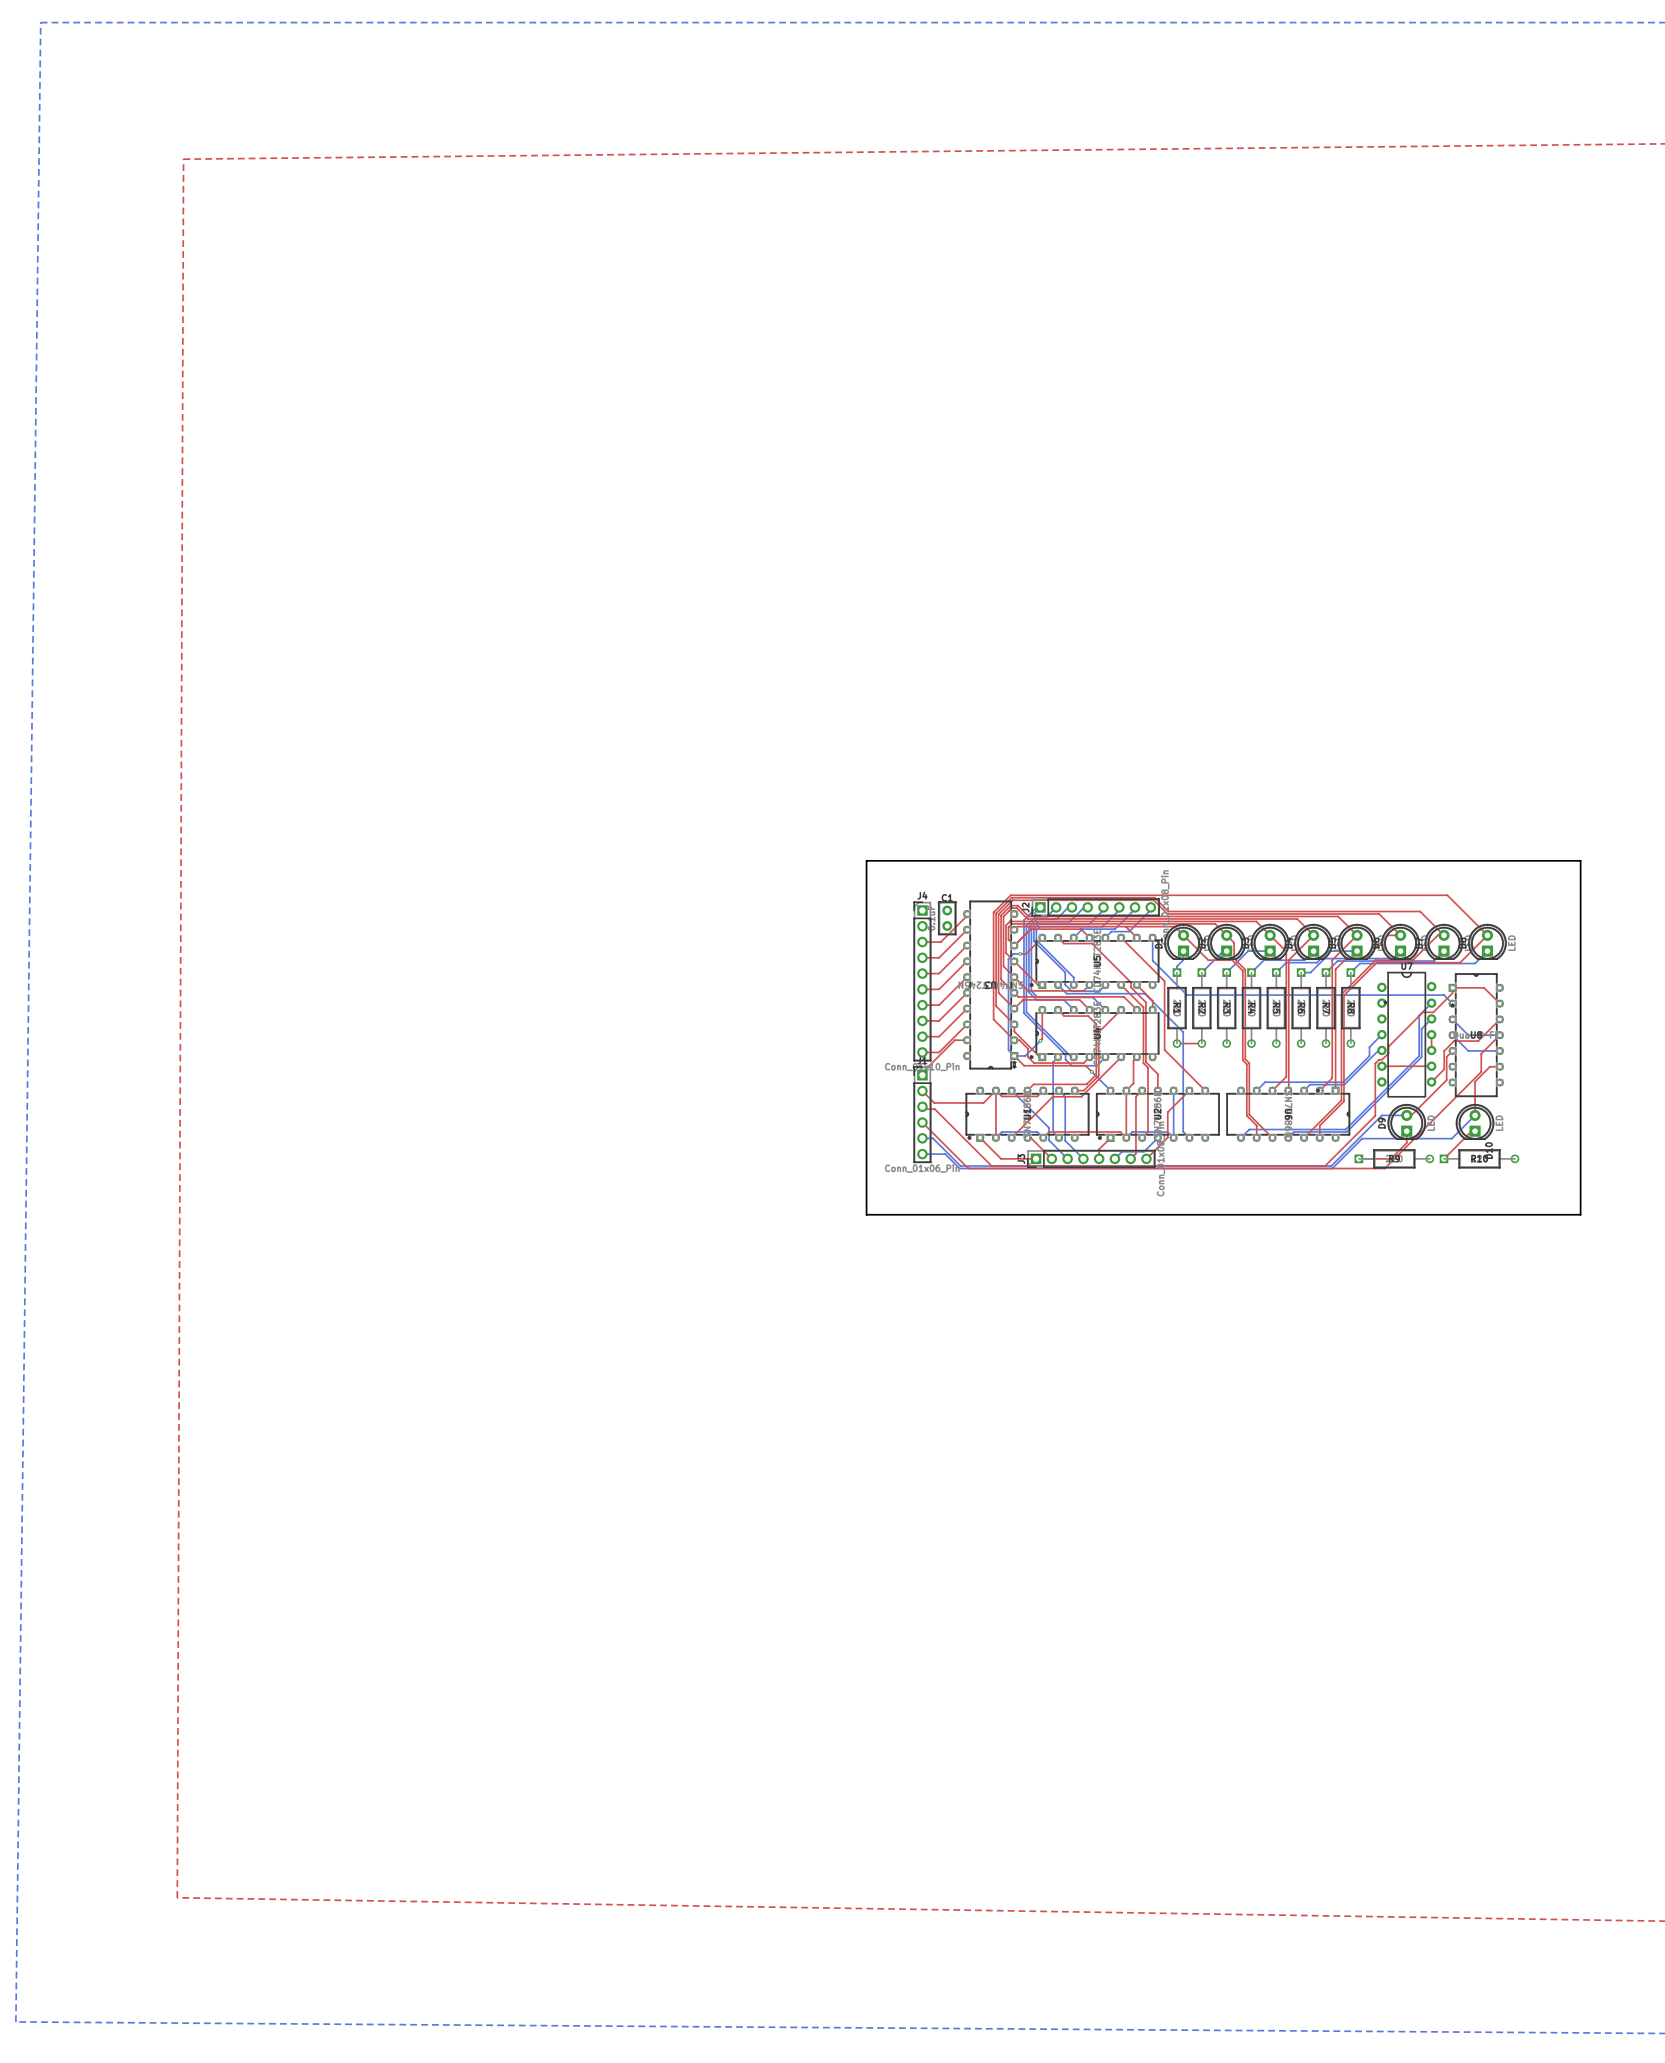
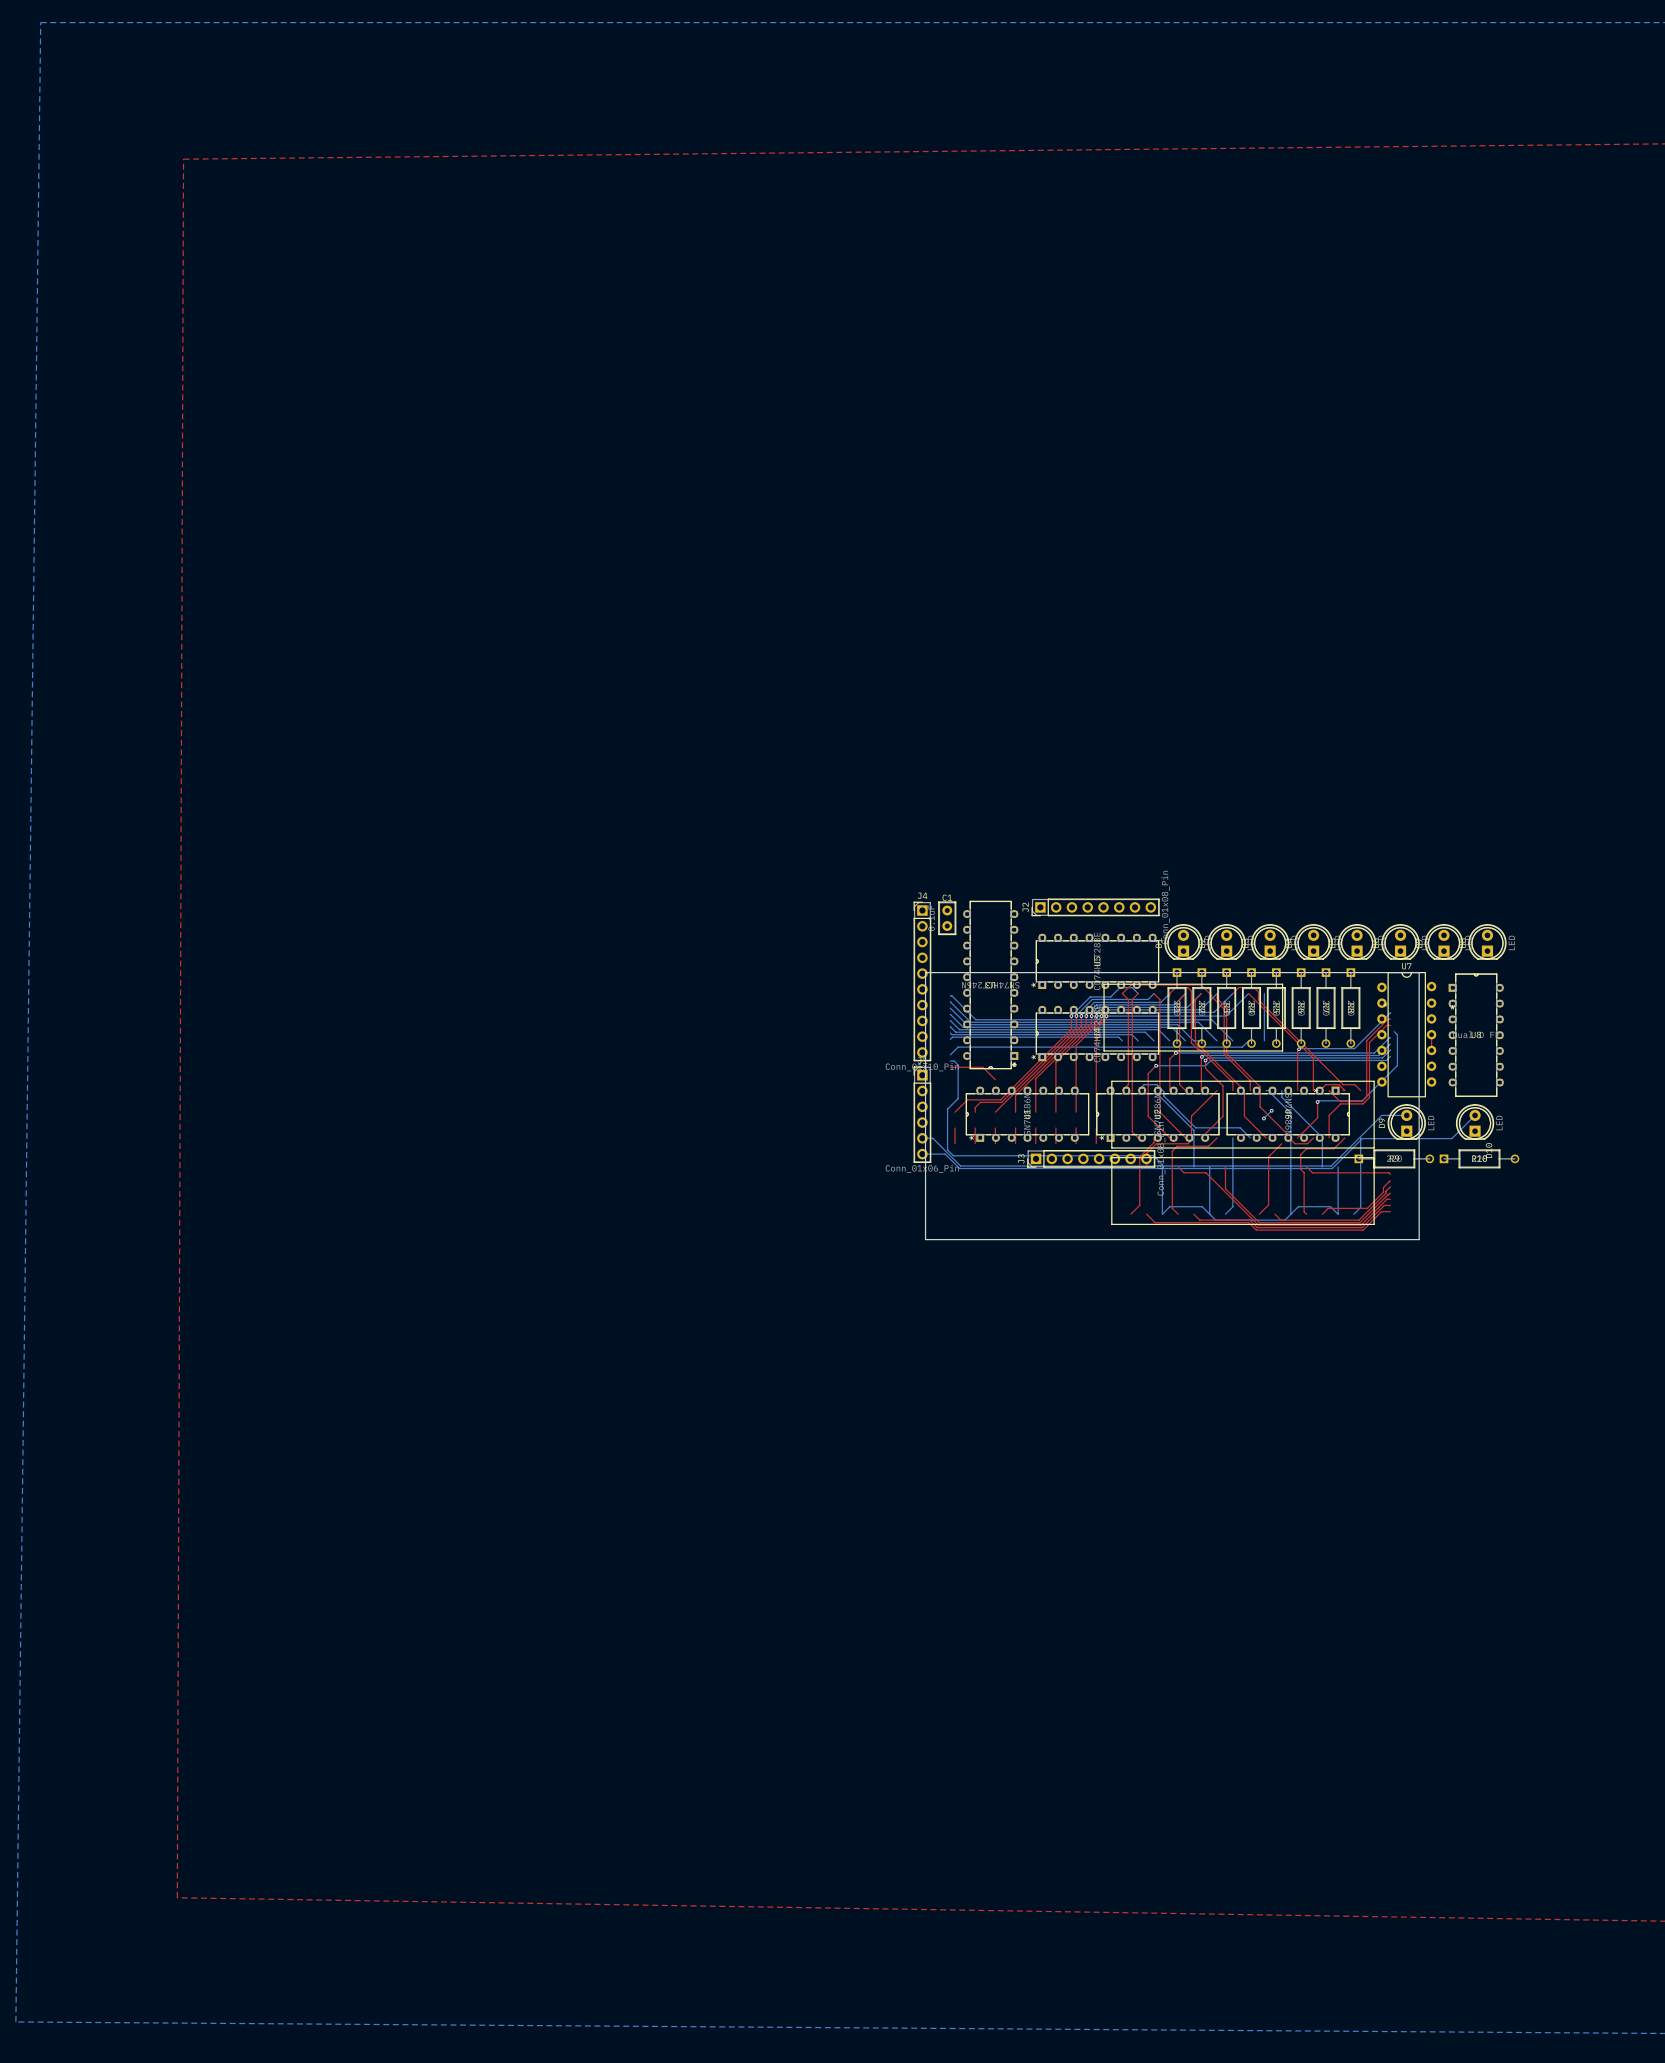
board edge: (866, 860) (1580, 860) (1580, 1214) (866, 1214) (866, 860) -> none
bottom track: (1040, 907) (1036, 907) (1023, 920) (1023, 1013) (1065, 1054) (1065, 1059) (1071, 1065) (1096, 1065) (1105, 1057) -> none
bottom track: (1056, 907) (1046, 916) (1035, 916) (1026, 925) (1026, 1012) (1071, 1057) (1073, 1057) -> none
bottom track: (1071, 907) (1068, 907) (1056, 919) (1036, 919) (1028, 926) (1028, 992) (1036, 999) (1063, 999) (1073, 1009) -> none
bottom track: (1087, 907) (1084, 907) (1069, 921) (1037, 921) (1031, 927) (1031, 991) (1037, 997) (1092, 997) (1105, 1009) -> none
bottom track: (1103, 907) (1103, 910) (1089, 924) (1038, 924) (1033, 929) (1033, 941) (1065, 972) (1065, 984) (1071, 991) (1099, 991) (1105, 985) -> none
bottom track: (1119, 907) (1119, 910) (1102, 926) (1039, 926) (1036, 930) (1036, 940) (1073, 977) (1073, 985) -> none
bottom track: (1135, 907) (1114, 929) (1082, 929) (1073, 937) -> none
bottom track: (1150, 907) (1150, 910) (1129, 931) (1111, 931) (1105, 937) -> none
top track: (967, 914) (940, 942) (922, 942) -> none
top track: (1125, 926) (1136, 937) -> none
top track: (967, 929) (939, 957) (922, 957) -> none
top track: (1014, 929) (1017, 926) (1174, 926) (1208, 960) (1232, 960) (1242, 970) (1242, 1060) (1246, 1064) (1246, 1115) (1256, 1125) (1256, 1137) -> none
top track: (1042, 937) (1026, 953) (1020, 953) -> none
top track: (1058, 937) (1063, 943) (1092, 943) (1131, 982) (1131, 987) (1145, 1002) (1145, 1062) (1157, 1074) (1157, 1090) -> none
top track: (1089, 937) (1081, 929) (1030, 929) (1014, 945) (1008, 939) (1008, 927) (1011, 923) (1215, 923) (1234, 942) (1234, 958) (1245, 969) (1245, 1059) (1249, 1063) (1249, 1114) (1272, 1137) -> none
top track: (1121, 937) (1164, 981) (1164, 1049) (1205, 1090) -> none
bottom track: (1152, 937) (1152, 960) (1187, 995) (1444, 995) (1452, 1003) -> none
top track: (967, 945) (939, 973) (922, 973) -> none
bottom track: (1183, 951) (1183, 959) (1177, 966) (1177, 972) -> none
bottom track: (1226, 951) (1223, 951) (1201, 972) -> none
bottom track: (1270, 951) (1248, 951) (1226, 972) -> none
bottom track: (1313, 951) (1304, 960) (1263, 960) (1251, 972) -> none
bottom track: (1357, 951) (1328, 951) (1316, 962) (1286, 962) (1276, 972) -> none
bottom track: (1400, 951) (1393, 958) (1324, 958) (1310, 972) (1301, 972) -> none
bottom track: (1444, 951) (1434, 961) (1337, 961) (1326, 972) -> none
bottom track: (1487, 951) (1475, 963) (1359, 963) (1350, 972) -> none
bottom track: (1020, 953) (1013, 953) (1008, 958) (1008, 1050) (1014, 1055) (1025, 1055) (1040, 1040) -> none
via: (1020, 953) -> none
top track: (967, 961) (939, 989) (922, 989) -> none
board edge: none -> (925, 972) (1419, 972) (1419, 1239) (925, 1239) (925, 972)
top track: (967, 977) (939, 1005) (922, 1005) -> none
line: none -> (1104, 984) (1282, 984) (1282, 1050) (1104, 1050) (1104, 984)
top track: (1042, 985) (1038, 985) (1006, 952) (1006, 925) (1009, 921) (1256, 921) (1286, 951) (1286, 1076) (1272, 1090) -> none
bottom track: (1058, 985) (1066, 993) (1144, 993) (1183, 1032) (1183, 1131) (1189, 1137) -> none
top track: (1089, 985) (1083, 990) (1028, 990) (1003, 966) (1003, 916) (1011, 908) (1016, 908) (1027, 918) (1297, 918) (1313, 935) (1288, 960) (1288, 1090) -> none
top track: (1121, 985) (1143, 1007) (1143, 1063) (1147, 1067) (1147, 1132) (1142, 1137) -> none
top track: (1136, 985) (1152, 1000) (1152, 1009) -> none
top track: (967, 992) (939, 1020) (922, 1020) -> none
top track: none -> (1138, 993) (1132, 999) (1132, 1131) (1138, 1137)
bottom track: none -> (1138, 993) (1132, 987) (1119, 987) (1110, 996) (1090, 996) (1071, 1016)
top track: none -> (1153, 993) (1159, 999) (1159, 1112) (1185, 1137)
bottom track: none -> (1153, 993) (1148, 999) (1092, 999) (1076, 1016)
bottom track: none -> (1169, 993) (1160, 1002) (1094, 1002) (1081, 1016)
top track: none -> (1185, 993) (1179, 999) (1179, 1084) (1185, 1090)
bottom track: none -> (1185, 993) (1174, 1004) (1096, 1004) (1086, 1016)
top track: none -> (1201, 993) (1195, 999) (1195, 1043) (1244, 1090) (1244, 1116) (1266, 1137)
bottom track: none -> (1201, 993) (1187, 1007) (1097, 1007) (1091, 1013) (1091, 1016)
top track: none -> (1217, 993) (1217, 998) (1226, 1008) (1226, 1053) (1260, 1086) (1260, 1106) (1295, 1143) (1307, 1143) (1313, 1137)
bottom track: none -> (1217, 993) (1200, 1009) (1100, 1009) (1096, 1016)
top track: none -> (1232, 993) (1238, 987) (1254, 987) (1258, 991) (1258, 999) (1343, 1084) (1354, 1084) (1360, 1090)
bottom track: none -> (1232, 993) (1214, 1012) (1102, 1012) (1101, 1016)
top track: none -> (1248, 993) (1313, 1058) (1313, 1090)
bottom track: none -> (1248, 993) (1226, 1016) (1106, 1016)
bottom track: none -> (1264, 993) (1264, 1040)
bottom track: none -> (950, 995) (975, 1019) (1211, 1019) (1232, 1040)
top track: none -> (1169, 996) (1169, 993) (1175, 987) (1187, 987) (1191, 991) (1191, 1042) (1232, 1082) (1232, 1090)
bottom track: none -> (950, 1002) (970, 1022) (1198, 1022) (1217, 1040)
bottom track: (1431, 1003) (1419, 1015) (1419, 1056) (1345, 1129) (1249, 1129) (1240, 1137) -> none
top track: (1499, 1003) (1484, 987) (1452, 987) (1452, 993) (1433, 1012) (1422, 1012) (1388, 1046) (1388, 1053) (1375, 1063) (1375, 1115) (1325, 1166) (991, 1166) (934, 1109) (924, 1109) (922, 1106) -> none
bottom track: none -> (950, 1008) (966, 1024) (1177, 1024) (1193, 1040) (1201, 1040)
top track: (967, 1008) (939, 1036) (922, 1036) -> none
top track: (1042, 1009) (1042, 1039) (1040, 1040) -> none
top track: (1058, 1009) (1064, 1016) (1088, 1016) (1096, 1024) (1096, 1028) -> (1106, 1016) (1106, 1018) (1096, 1028)
top track: (1089, 1009) (1079, 999) (1023, 999) (1014, 1008) (998, 992) (998, 914) (1012, 900) (1153, 900) (1167, 913) (1379, 913) (1400, 935) (1388, 935) (1364, 958) (1346, 958) (1335, 969) (1335, 1090) -> none
top track: (1121, 1009) (1098, 1032) (1098, 1075) (1083, 1090) (1074, 1090) -> none
top track: (1136, 1009) (1123, 996) (1018, 996) (1001, 979) (1001, 915) (1010, 905) (1017, 905) (1028, 916) (1338, 916) (1357, 935) (1332, 960) (1332, 1078) (1325, 1084) -> (1343, 1090) (1344, 1090) (1339, 1084) (1325, 1084)
bottom track: none -> (1390, 1012) (1354, 1048) (1299, 1049)
bottom track: none -> (950, 1014) (963, 1027) (1171, 1027) (1185, 1040)
top track: none -> (1071, 1016) (1071, 1029) (1000, 1099) (967, 1099) (955, 1112)
via: none -> (1071, 1016)
top track: none -> (1076, 1016) (1076, 1027) (1001, 1102) (980, 1102) (975, 1107) (975, 1112)
via: none -> (1076, 1016)
top track: none -> (1081, 1016) (1081, 1026) (995, 1112)
via: none -> (1081, 1016)
top track: none -> (1086, 1016) (1086, 1024) (1015, 1095) (1015, 1112)
via: none -> (1086, 1016)
top track: none -> (1091, 1016) (1091, 1022) (1035, 1078) (1035, 1112)
via: none -> (1091, 1016)
top track: none -> (1096, 1016) (1096, 1021) (1055, 1062) (1055, 1112)
via: none -> (1096, 1016)
top track: none -> (1101, 1016) (1101, 1020) (1076, 1045) (1076, 1112)
via: none -> (1101, 1016)
via: none -> (1106, 1016)
bottom track: (1431, 1018) (1421, 1028) (1421, 1057) (1346, 1132) (1294, 1132) (1288, 1137) -> none
top track: none -> (1390, 1019) (1388, 1019) (1366, 1040) (1366, 1096) (1362, 1101) (1340, 1101) (1329, 1090)
bottom track: (1452, 1019) (1468, 1035) (1499, 1035) -> none
top track: (1499, 1019) (1478, 1041) (1454, 1041) (1444, 1051) (1444, 1069) (1431, 1082) -> none
bottom track: none -> (950, 1020) (959, 1029) (1158, 1029) (1169, 1040)
top track: (967, 1024) (939, 1052) (922, 1052) -> none
top track: none -> (1390, 1025) (1386, 1025) (1369, 1042) (1369, 1097) (1363, 1103) (1340, 1103) (1329, 1115) (1329, 1137)
bottom track: none -> (950, 1026) (955, 1032) (1145, 1032) (1153, 1040)
bottom track: none -> (1394, 1031) (1397, 1034) (1397, 1065) (1362, 1100) (1317, 1102)
bottom track: none -> (950, 1033) (951, 1034) (1131, 1034) (1138, 1040)
bottom track: (1381, 1034) (1369, 1047) (1369, 1056) (1343, 1082) (1265, 1082) (1256, 1090) -> none
bottom track: (1452, 1035) (1468, 1050) (1499, 1050) -> none
top track: (1499, 1035) (1481, 1053) (1481, 1071) (1384, 1168) (968, 1168) (922, 1122) -> none
bottom track: none -> (1390, 1037) (1374, 1053) (1175, 1053)
bottom track: none -> (950, 1039) (952, 1037) (1118, 1037) (1122, 1040)
top track: (967, 1040) (954, 1040) (922, 1072) (922, 1075) -> none
via: (1040, 1040) -> none
bottom track: none -> (1248, 1040) (1242, 1047) (958, 1047) (950, 1054)
top track: (1177, 1043) (1201, 1043) -> none
bottom track: none -> (1390, 1044) (1378, 1055) (1201, 1056)
top track: none -> (1299, 1049) (1297, 1090)
via: none -> (1299, 1049)
bottom track: (1381, 1050) (1378, 1050) (1344, 1084) (1309, 1084) (1304, 1090) -> none
bottom track: none -> (1390, 1050) (1382, 1057) (1208, 1057) (1205, 1060)
top track: (1452, 1050) (1446, 1056) (1446, 1080) (1411, 1115) (1406, 1115) -> none
top track: none -> (1175, 1053) (1169, 1059) (1169, 1090)
via: none -> (1175, 1053)
top track: (1014, 1055) (1024, 1065) (1085, 1065) (1091, 1071) -> none
top track: none -> (1201, 1056) (1201, 1090)
via: none -> (1201, 1056)
bottom track: none -> (1390, 1056) (1386, 1060) (1210, 1060) (1205, 1065) (1156, 1065)
top track: (1039, 1057) (1014, 1031) (1014, 1024) (996, 1006) (996, 913) (1011, 897) (1154, 897) (1168, 911) (1420, 911) (1444, 935) (1437, 935) (1412, 960) (1375, 960) (1341, 994) (1341, 1100) (1304, 1137) -> none
bottom track: (1058, 1057) (1053, 1062) (1053, 1132) (1059, 1137) -> none
top track: (1089, 1057) (1083, 1063) (1034, 1063) (1027, 1057) (1027, 1048) (1019, 1040) (1014, 1040) (993, 1019) (993, 912) (1010, 895) (1447, 895) (1487, 935) (1460, 962) (1376, 962) (1343, 995) (1343, 1101) (1319, 1125) (1319, 1137) -> none
top track: (1121, 1057) (1081, 1096) (1052, 1096) (1011, 1137) -> none
top track: (1136, 1057) (1133, 1060) (1133, 1083) (1126, 1090) (1126, 1137) (1120, 1132) (1049, 1132) (1043, 1137) -> none
top track: none -> (1205, 1060) (1205, 1068) (1223, 1085) (1223, 1116) (1201, 1137)
via: none -> (1205, 1060)
bottom track: none -> (950, 1061) (954, 1061) (958, 1065) (958, 1098) (947, 1109) (947, 1149) (953, 1155) (1153, 1155) (1162, 1164)
top track: none -> (1156, 1065) (1148, 1073) (1148, 1116) (1169, 1137)
via: none -> (1156, 1065)
top track: (1381, 1066) (1431, 1066) -> none
top track: (1499, 1066) (1489, 1066) (1475, 1081) (1475, 1115) -> none
top track: none -> (950, 1067) (982, 1067) (995, 1079)
bottom track: (1091, 1071) (1110, 1090) -> none
via: (1091, 1071) -> none
top track: (1096, 1074) (1086, 1084) (1033, 1084) (1027, 1090) -> (1096, 1074) (1096, 1112)
line: none -> (1111, 1081) (1111, 1148) (1374, 1148) (1374, 1081) (1111, 1081)
top track: (995, 1090) (1001, 1096) (1037, 1096) (1043, 1090) -> none
top track: (995, 1090) (983, 1102) (934, 1102) (922, 1091) -> none
top track: (995, 1090) (995, 1137) -> none
bottom track: (1011, 1090) (1049, 1128) (1049, 1140) (1067, 1158) -> none
bottom track: (1059, 1090) (1065, 1096) (1065, 1140) (1083, 1158) -> none
top track: none -> (1122, 1090) (1128, 1084) (1128, 999) (1122, 993) (1130, 985) (1201, 985) (1224, 1009) (1224, 1054) (1250, 1080) (1250, 1090)
bottom track: none -> (1138, 1090) (1144, 1084) (1156, 1084) (1163, 1091) (1163, 1096) (1195, 1127) (1240, 1127) (1250, 1137)
top track: (1142, 1090) (1135, 1096) (1135, 1153) (1130, 1158) -> none
bottom track: none -> (1154, 1090) (1193, 1130) (1193, 1166)
bottom track: (1173, 1090) (1173, 1137) (1167, 1132) (1132, 1132) (1126, 1137) -> none
top track: (1189, 1090) (1167, 1112) (1167, 1137) (1146, 1158) -> none
top track: none -> (1217, 1090) (1191, 1116) (1191, 1140) (1188, 1143) (1156, 1143) (1146, 1153) (1146, 1166)
bottom track: none -> (1266, 1090) (1269, 1090) (1290, 1113) (1290, 1214)
bottom track: none -> (1281, 1090) (1281, 1097) (1322, 1137) (1322, 1166)
top track: none -> (1317, 1102) (1317, 1117) (1297, 1137)
via: none -> (1317, 1102)
bottom track: none -> (1271, 1110) (1263, 1118)
via: none -> (1271, 1110)
via: none -> (1263, 1118)
top track: none -> (955, 1127) (955, 1143)
top track: none -> (975, 1127) (975, 1143)
top track: none -> (995, 1127) (995, 1143)
top track: none -> (1015, 1127) (1015, 1143)
top track: none -> (1035, 1127) (1035, 1143)
top track: none -> (1055, 1127) (1055, 1143)
top track: none -> (1076, 1127) (1076, 1143)
top track: none -> (1096, 1127) (1096, 1143)
top track: (1406, 1131) (1406, 1142) (1390, 1158) (1358, 1158) -> none
top track: (1475, 1131) (1471, 1131) (1444, 1158) -> none
top track: (980, 1137) (1001, 1158) (1036, 1158) -> none
bottom track: (995, 1137) (1001, 1132) (1037, 1132) (1043, 1137) -> none
top track: (1027, 1137) (1030, 1137) (1051, 1158) -> none
top track: (1110, 1137) (1099, 1149) (1099, 1158) -> none
top track: none -> (1154, 1137) (1154, 1142) (1139, 1156) (1139, 1205) (1130, 1214)
bottom track: (1157, 1137) (1144, 1151) (1122, 1151) (1114, 1158) -> none
top track: none -> (1217, 1137) (1208, 1146) (1177, 1146) (1172, 1151) (1172, 1208) (1178, 1214)
bottom track: none -> (1232, 1137) (1232, 1206) (1225, 1214)
top track: none -> (1344, 1137) (1334, 1148) (1306, 1148) (1300, 1154) (1300, 1169) (1304, 1172) (1304, 1211) (1306, 1214)
bottom track: none -> (1360, 1137) (1360, 1207) (1353, 1214)
top track: none -> (1281, 1143) (1268, 1156) (1268, 1204) (1259, 1214)
line: none -> (1111, 1157) (1374, 1157) (1374, 1224) (1111, 1224) (1111, 1157)
bottom track: none -> (1162, 1166) (1162, 1214) (1169, 1206) (1202, 1206) (1215, 1220) (1227, 1220)
top track: none -> (1178, 1166) (1184, 1172) (1205, 1172) (1258, 1225) (1361, 1225) (1386, 1199) (1390, 1199)
bottom track: none -> (1209, 1166) (1209, 1214)
top track: none -> (1225, 1166) (1225, 1188) (1259, 1222) (1360, 1222) (1390, 1193)
top track: none -> (1306, 1166) (1312, 1172) (1388, 1172) (1390, 1174)
bottom track: none -> (1338, 1166) (1338, 1214) (1330, 1206) (1298, 1206) (1284, 1220) (1228, 1220)
top track: none -> (1390, 1180) (1383, 1187) (1383, 1192) (1367, 1208) (1328, 1208) (1322, 1214)
top track: none -> (1390, 1186) (1359, 1220) (1280, 1220) (1275, 1214)
top track: none -> (1390, 1205) (1384, 1205) (1362, 1227) (1257, 1227) (1249, 1220) (1199, 1220) (1193, 1214)
top track: none -> (1390, 1211) (1381, 1211) (1363, 1230) (1256, 1230) (1248, 1222) (1155, 1222) (1146, 1214)

